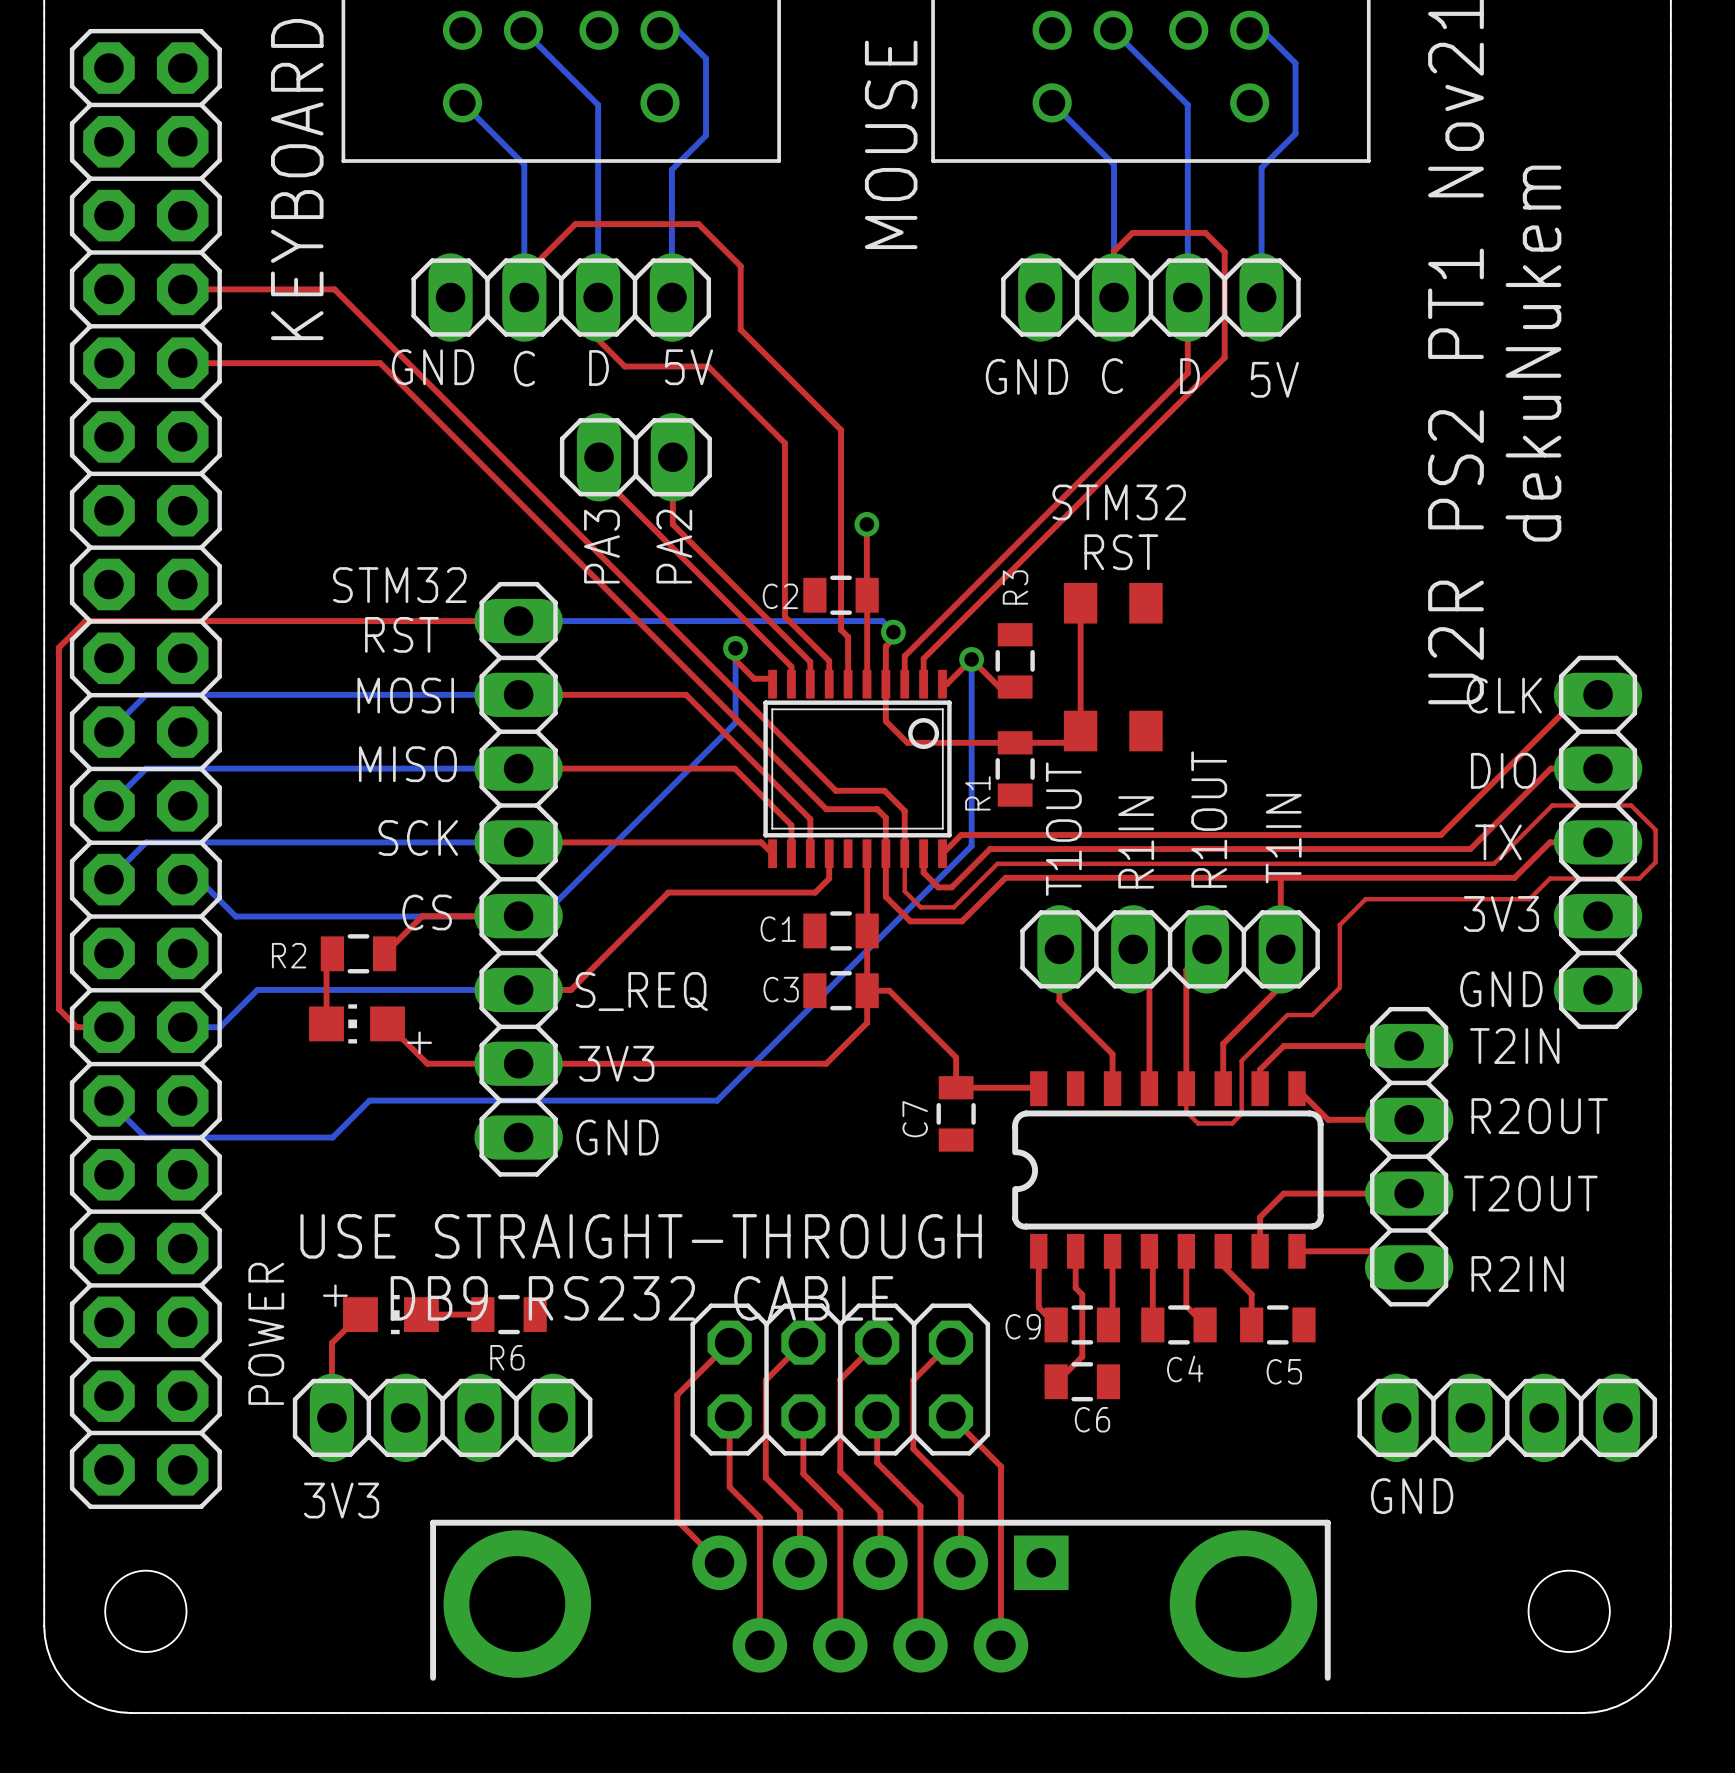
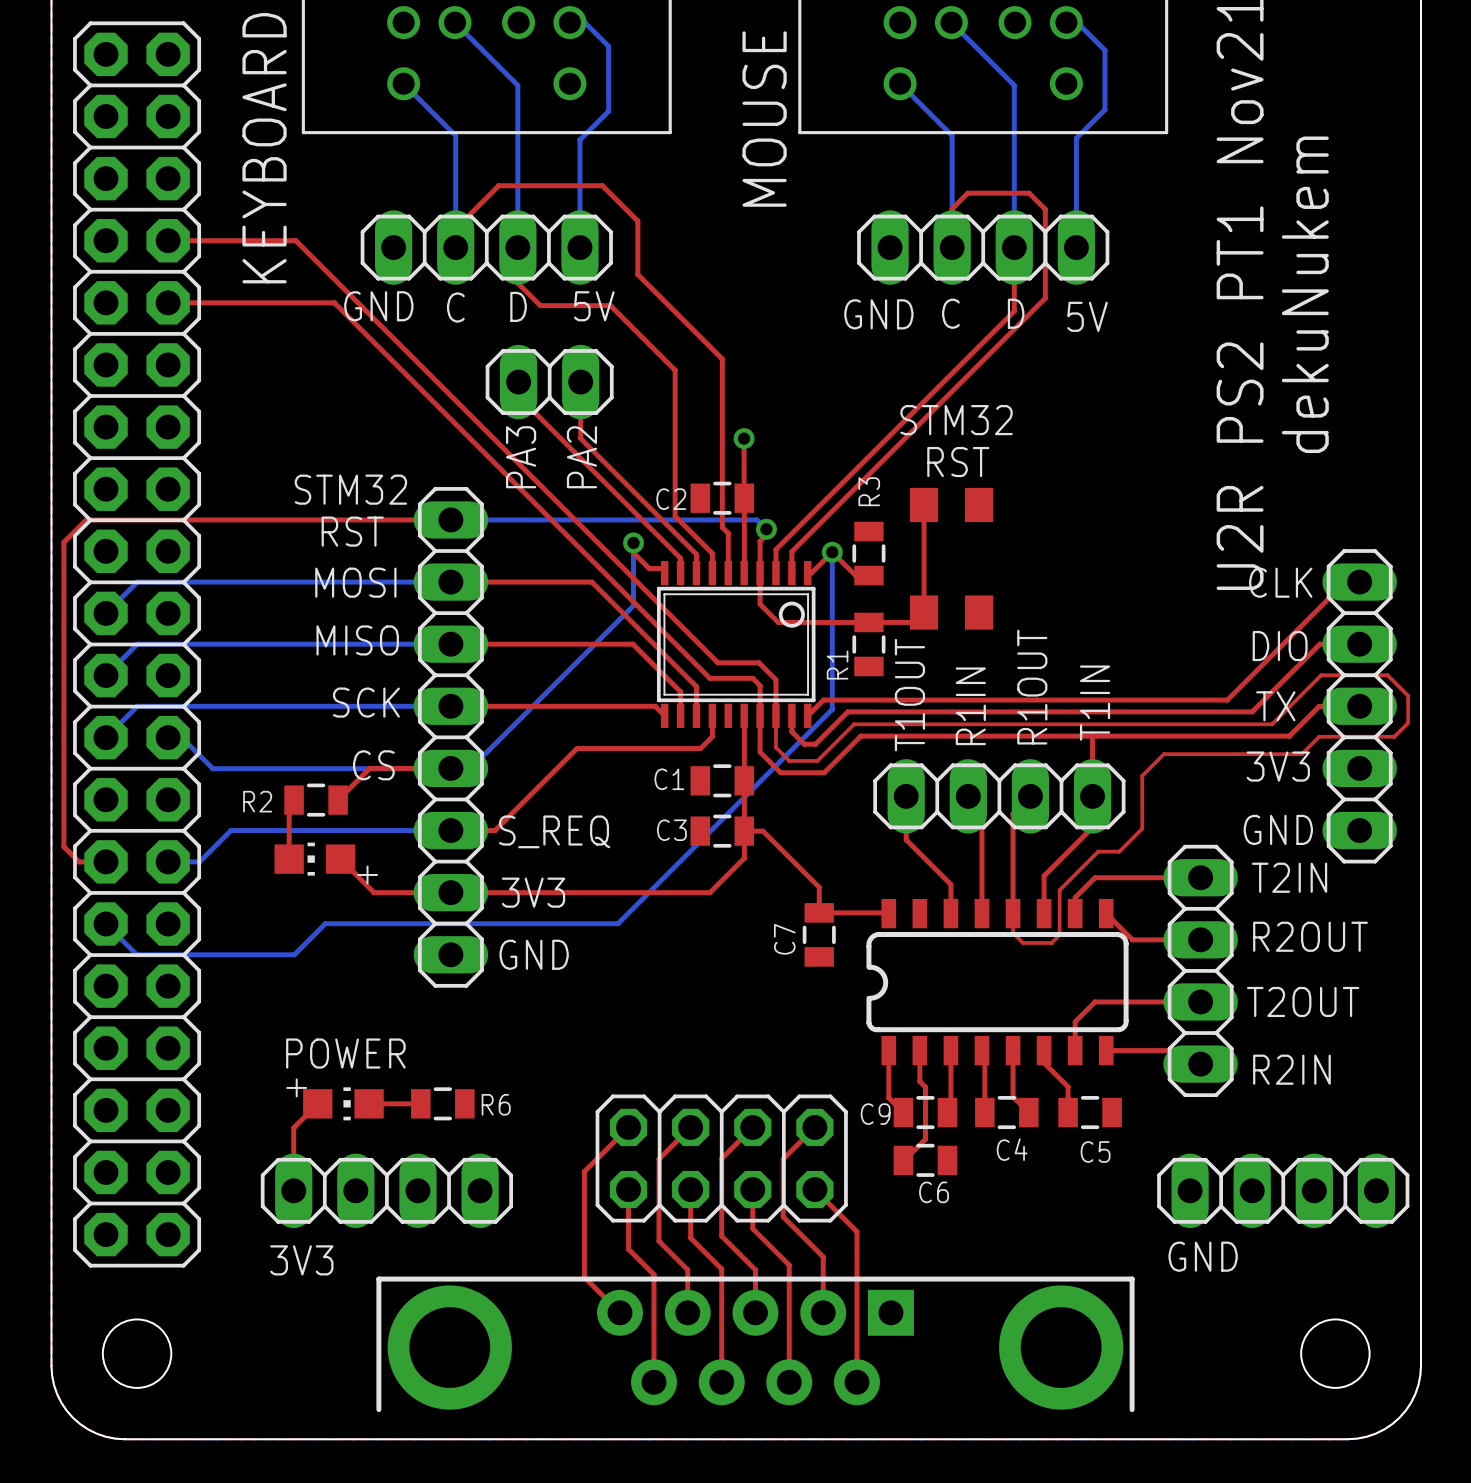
text: USE STRAIGHT-THROUGH (641, 1236) -> none
text: DB9 RS232 CABLE (641, 1298) -> none
text rotation: 0° (266, 1333) -> 90° clockwise (345, 1053)
R6 name position: R6 (507, 1357) -> R6 (496, 1104)

